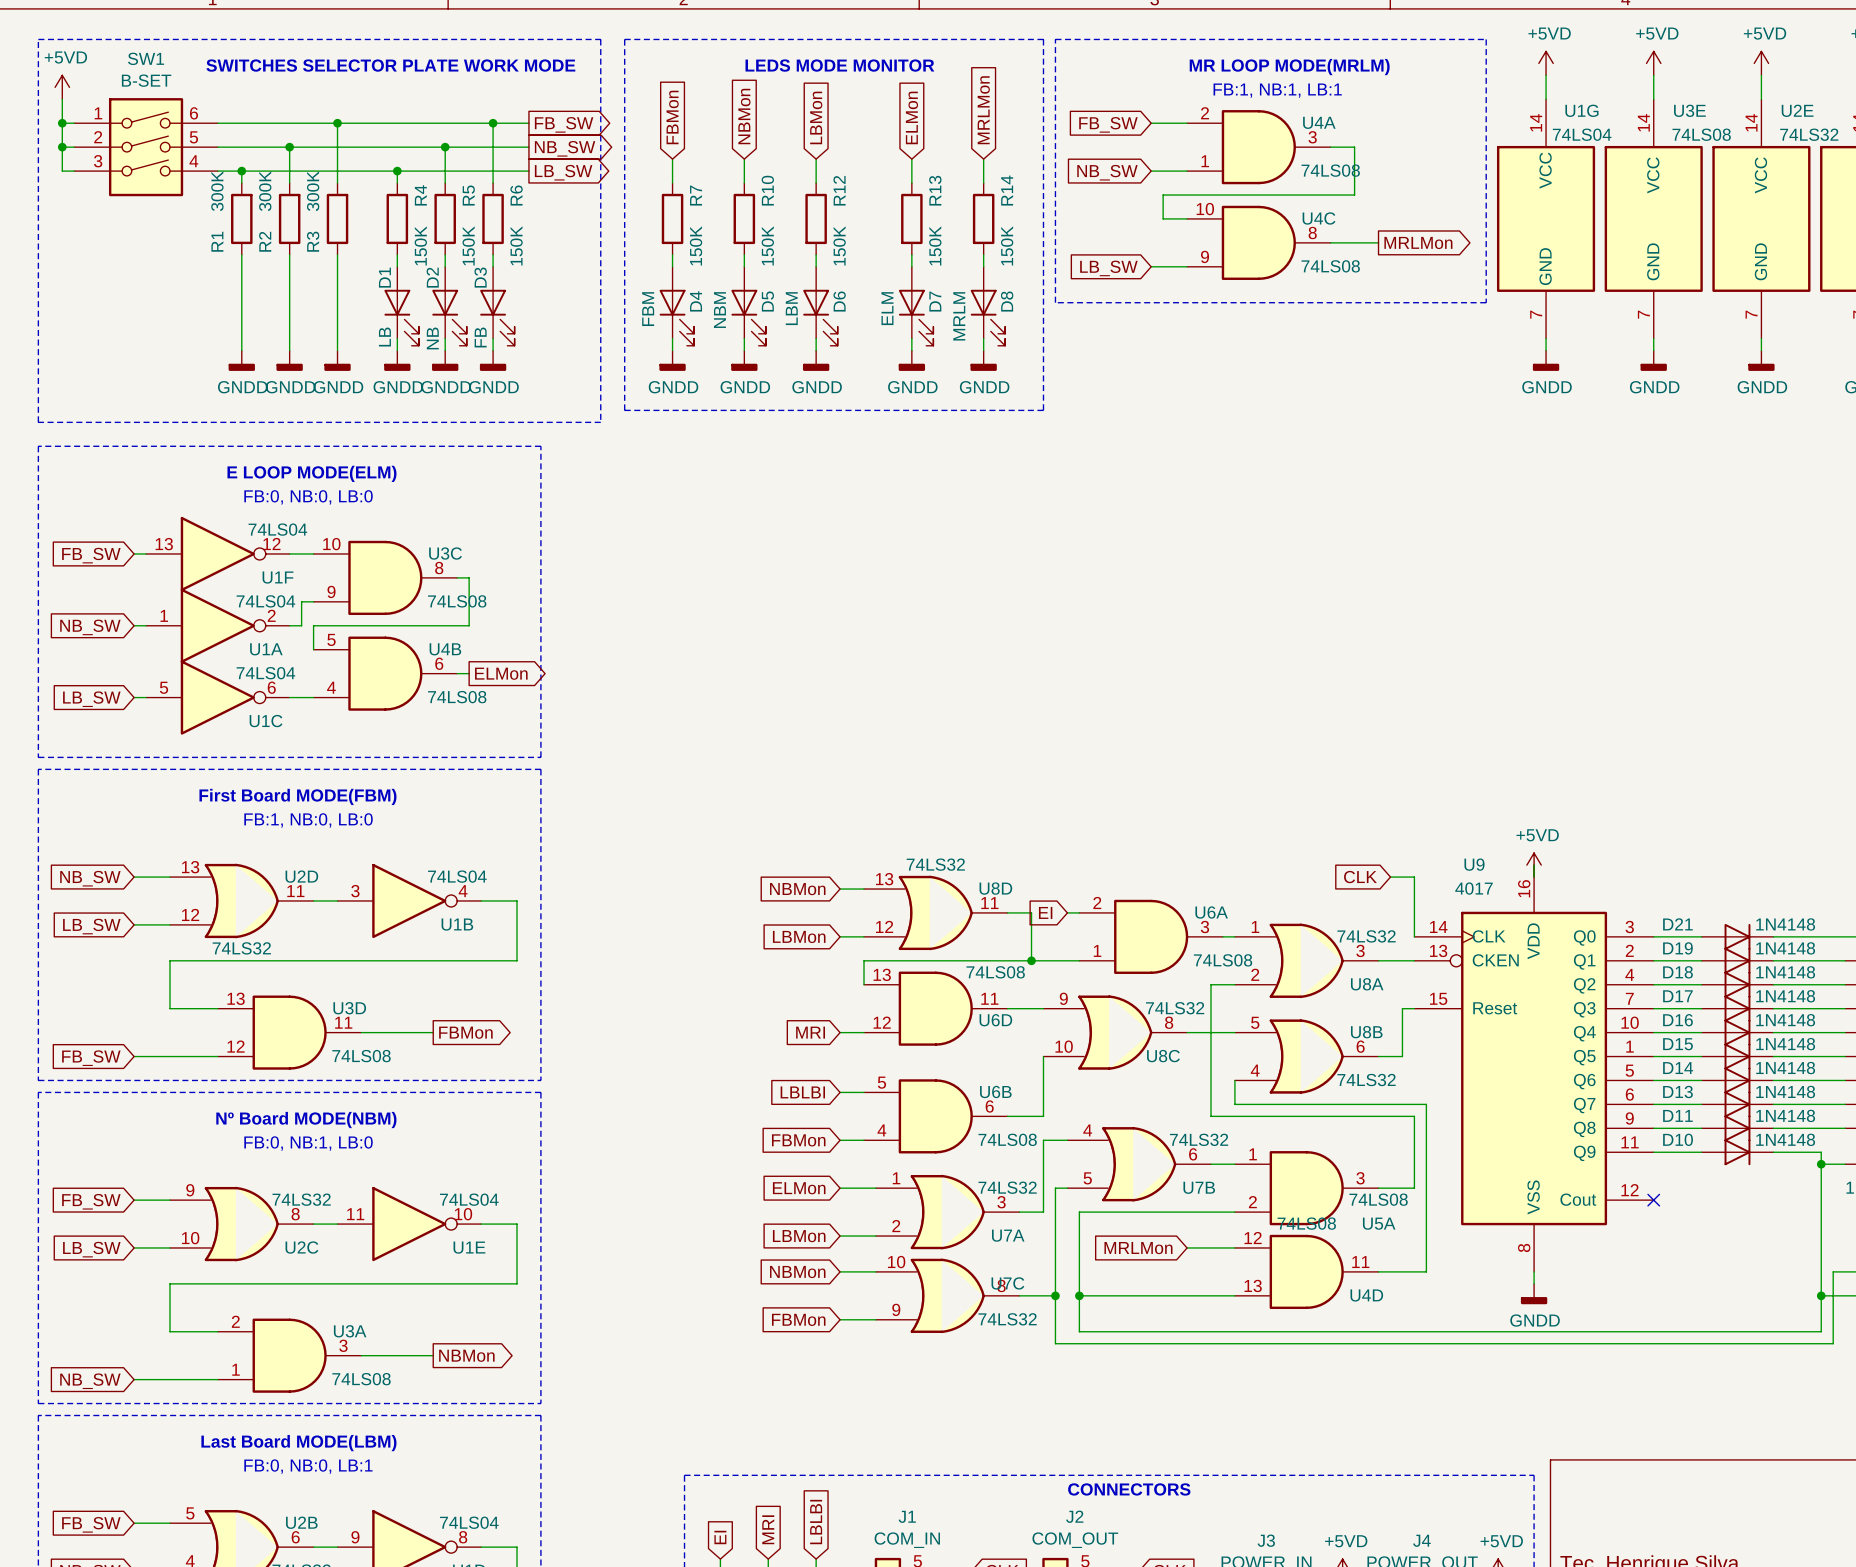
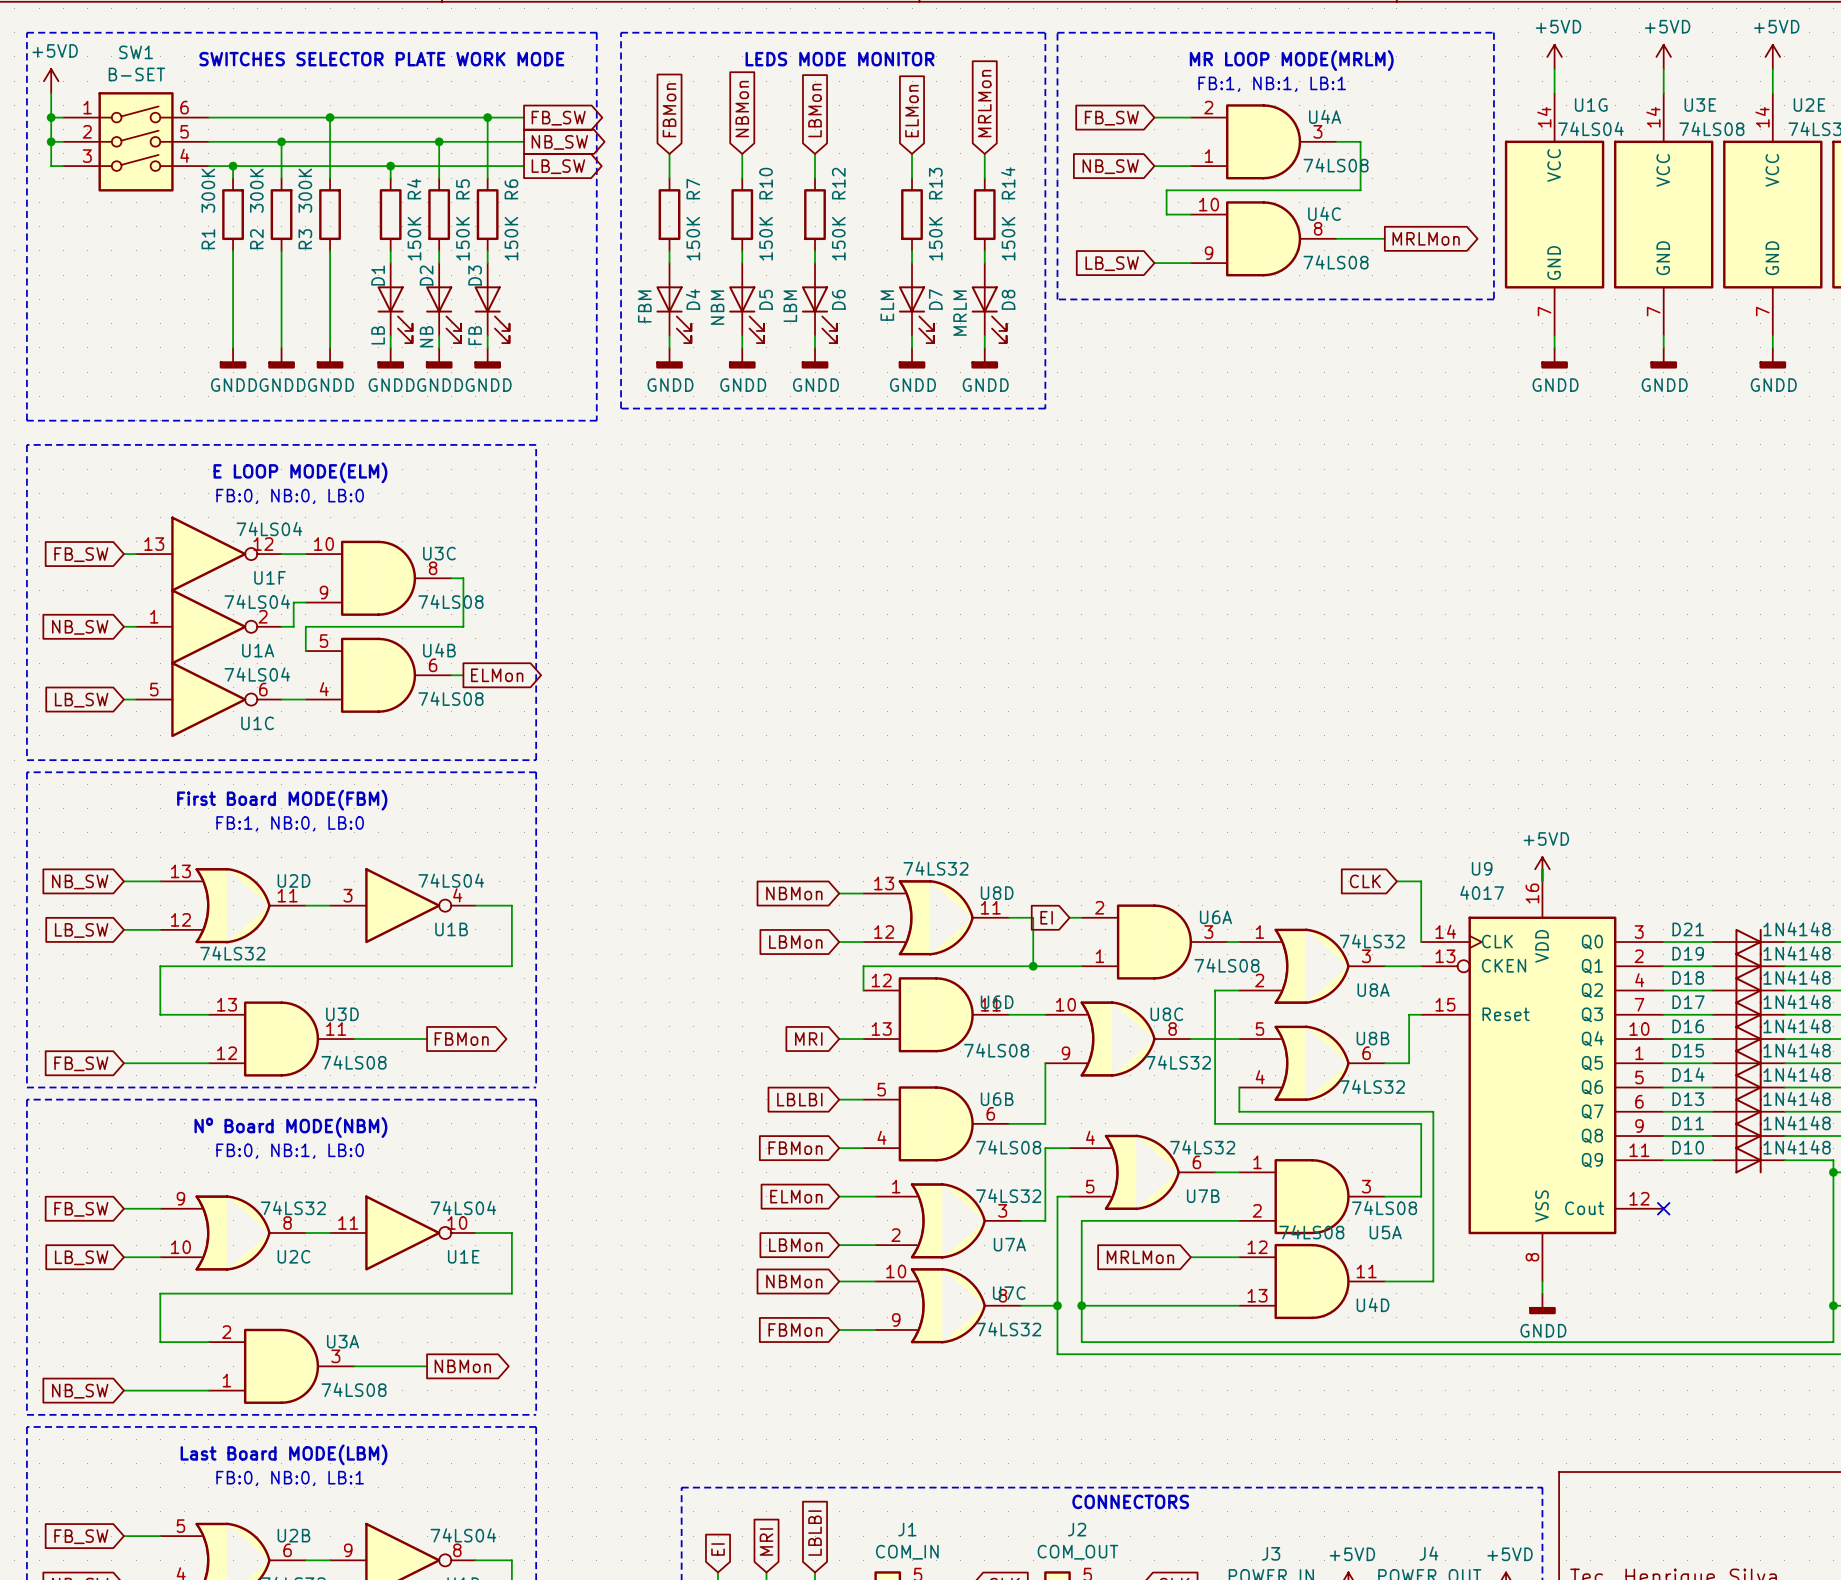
U6D flip: as is (935, 1008) -> up-down (936, 1014)
U8C flip: as is (1115, 1032) -> up-down (1118, 1039)

